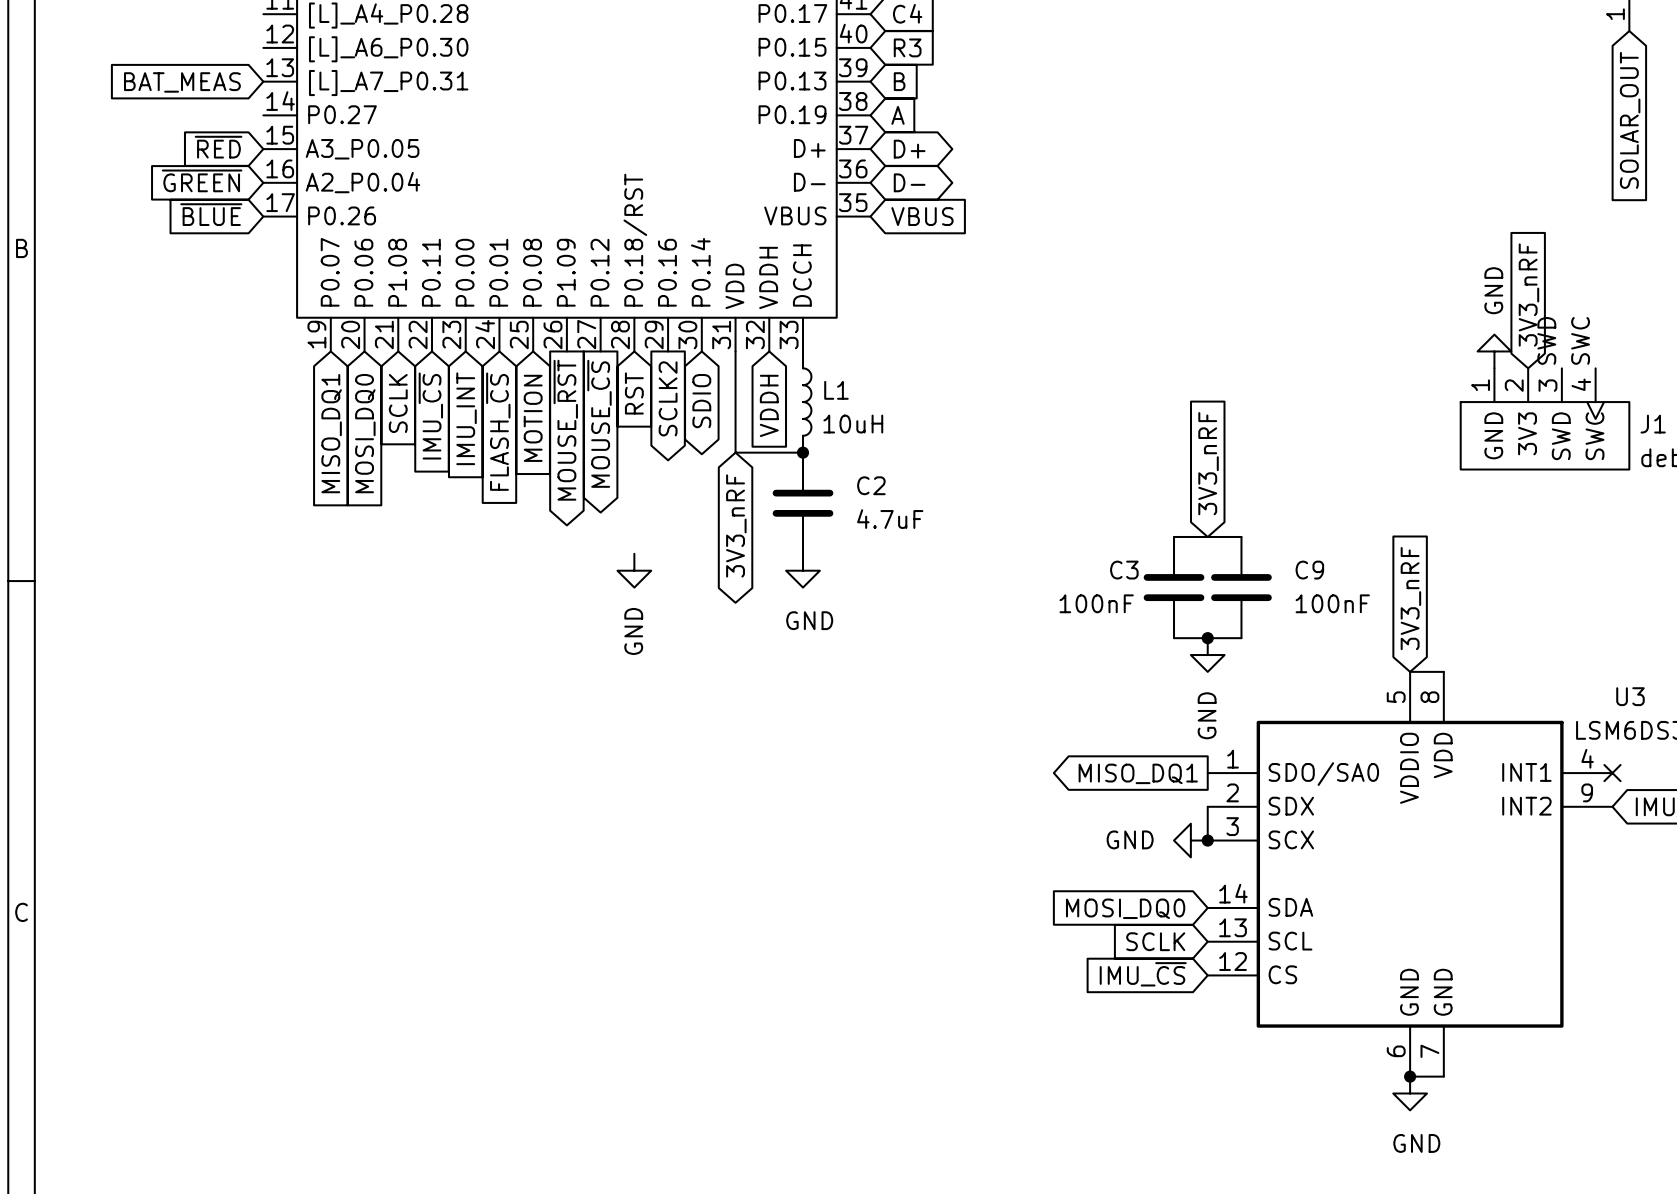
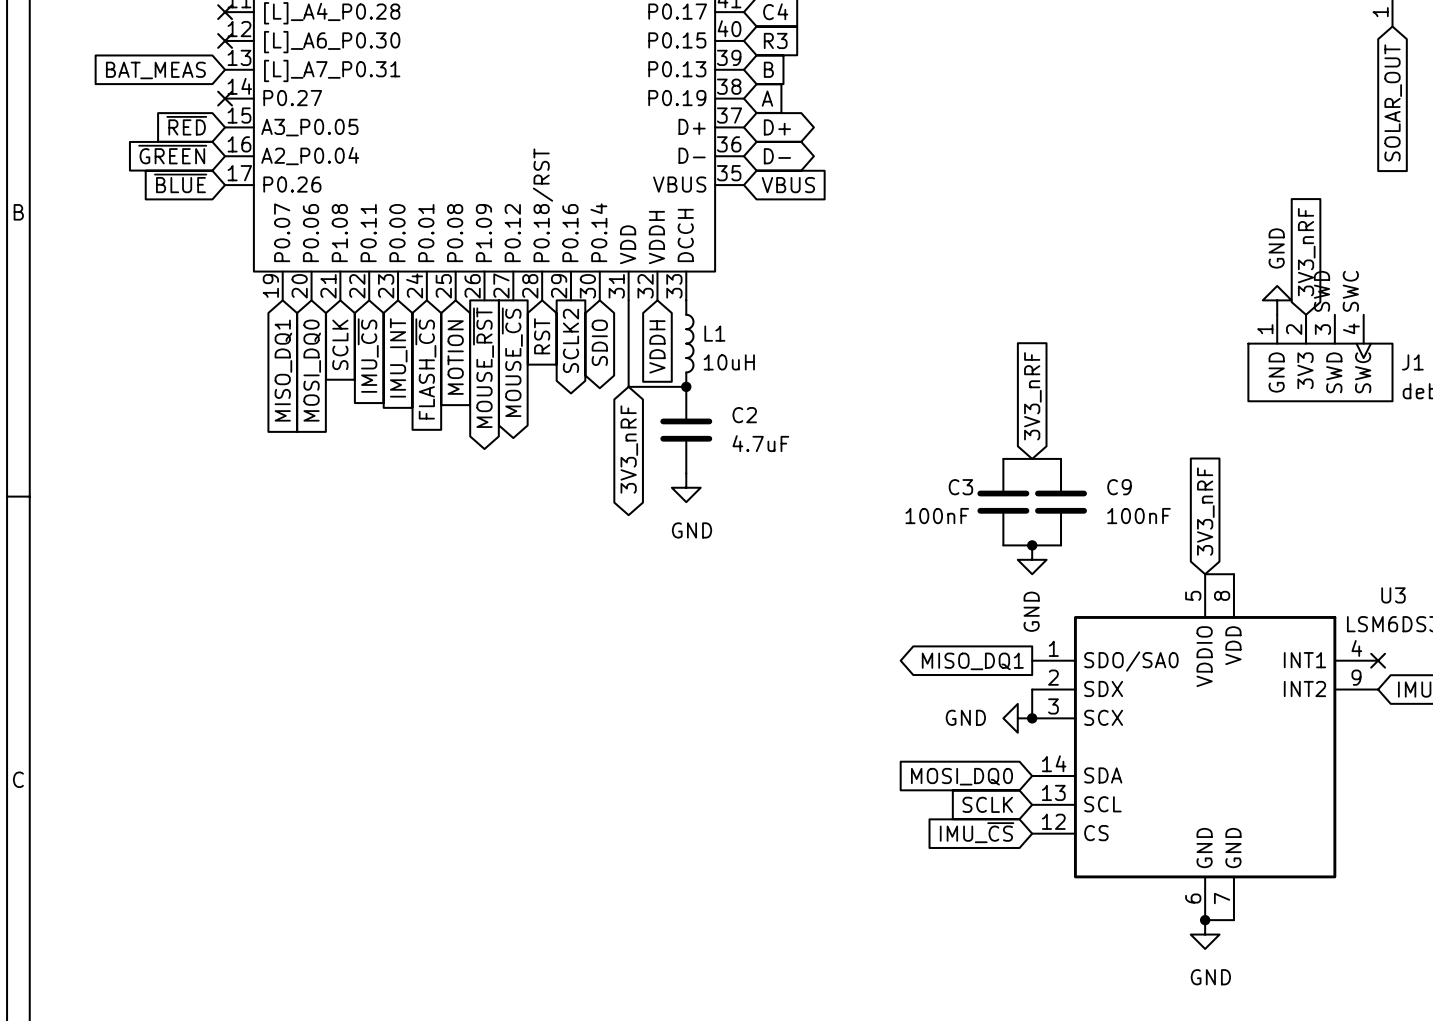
no-connect mark: none -> (225, 12)
no-connect mark: none -> (225, 40)
no-connect mark: none -> (225, 98)
power symbol: GND (634, 570) -> none

